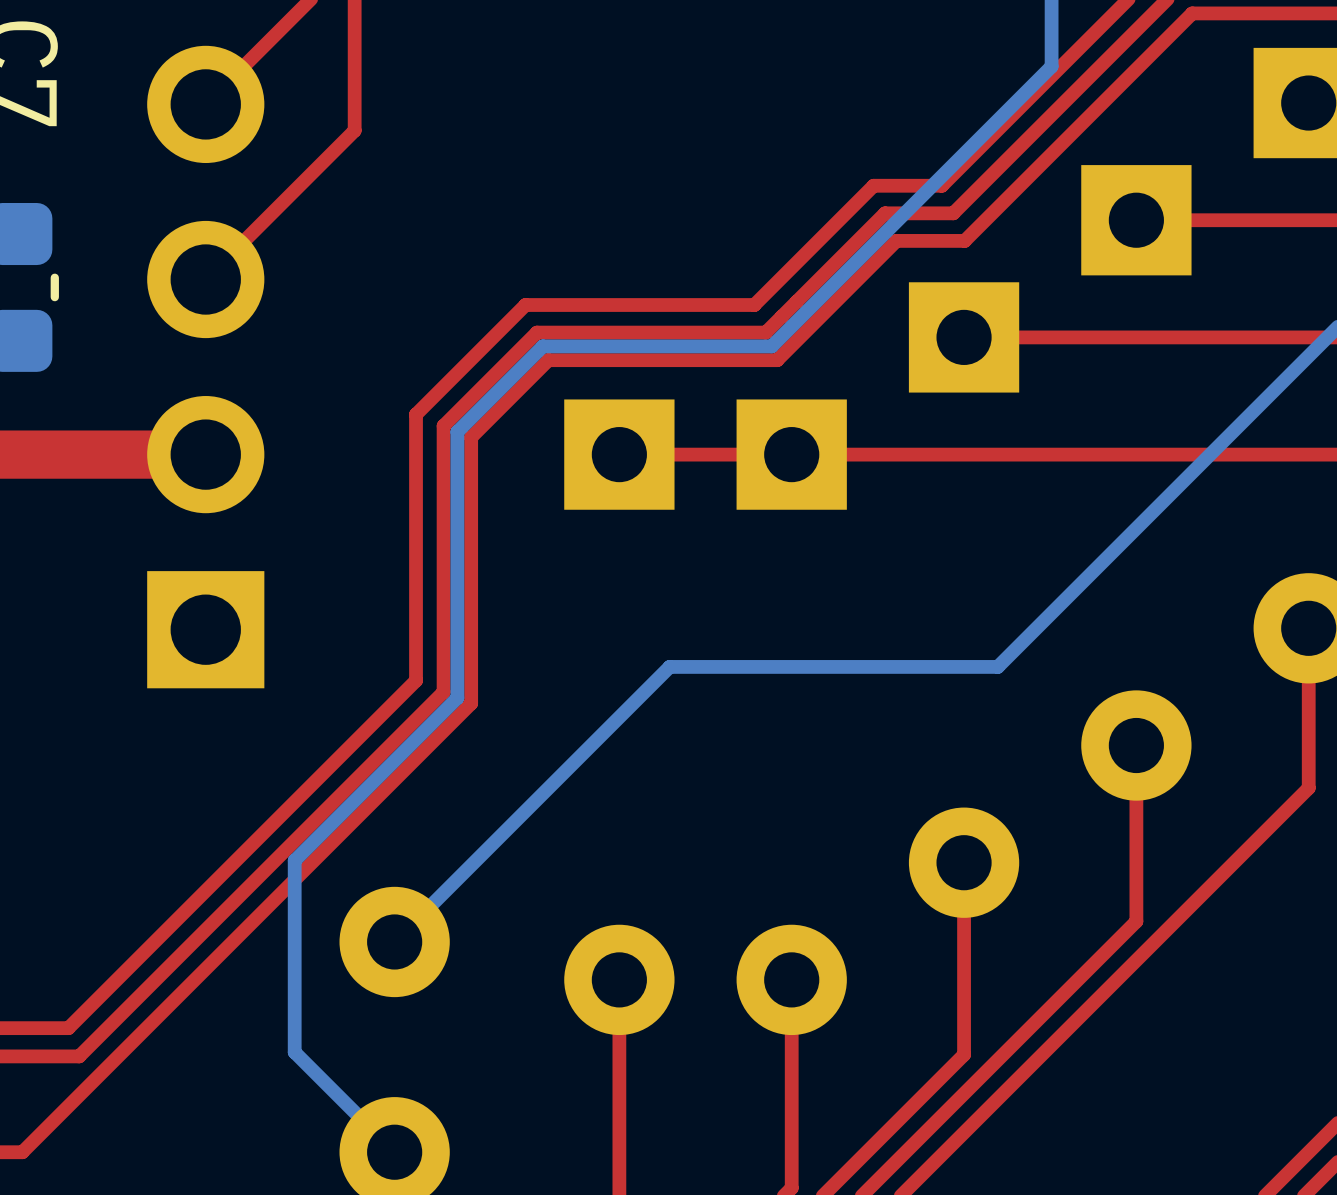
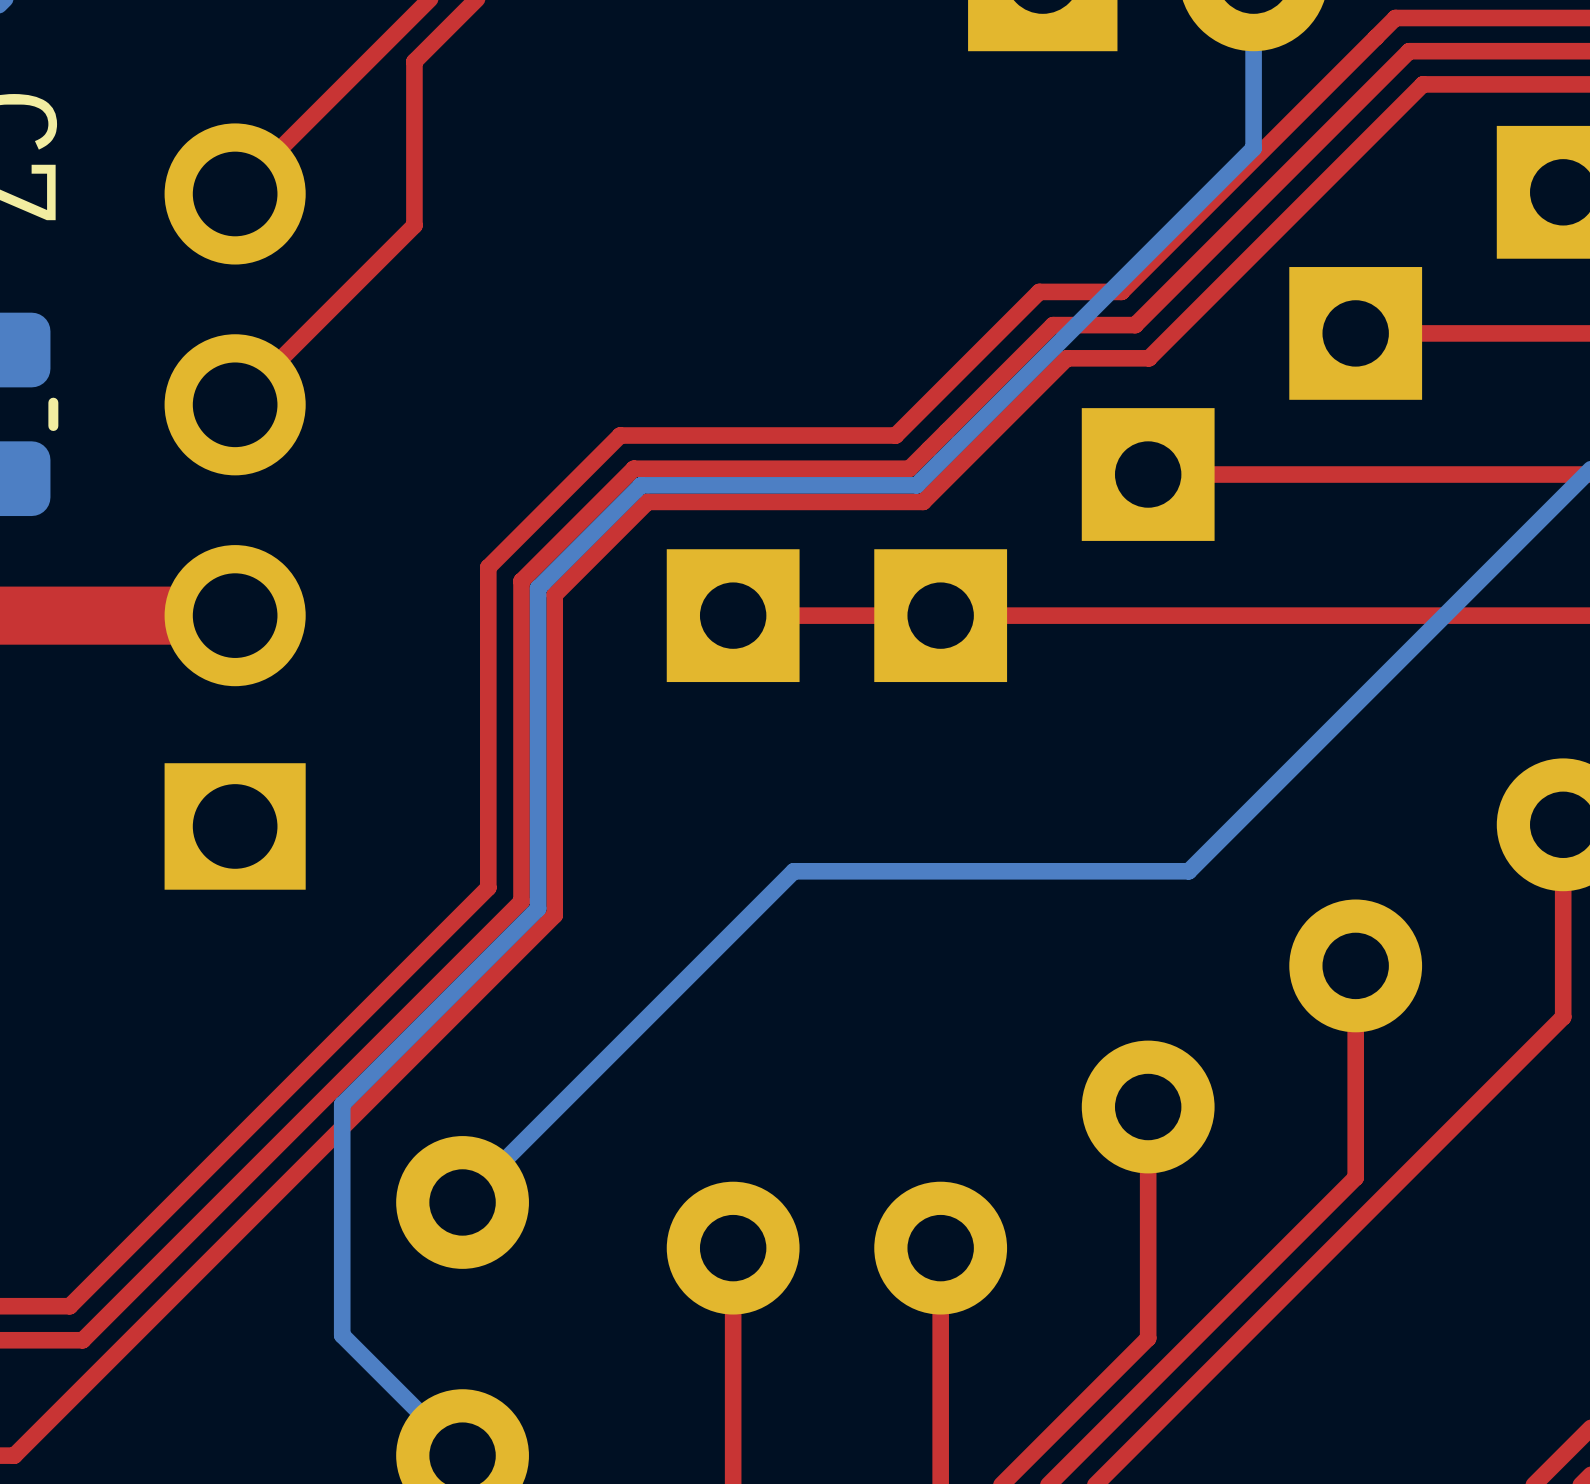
part footprint: [147, 45, 265, 689] -> [164, 123, 306, 890]

